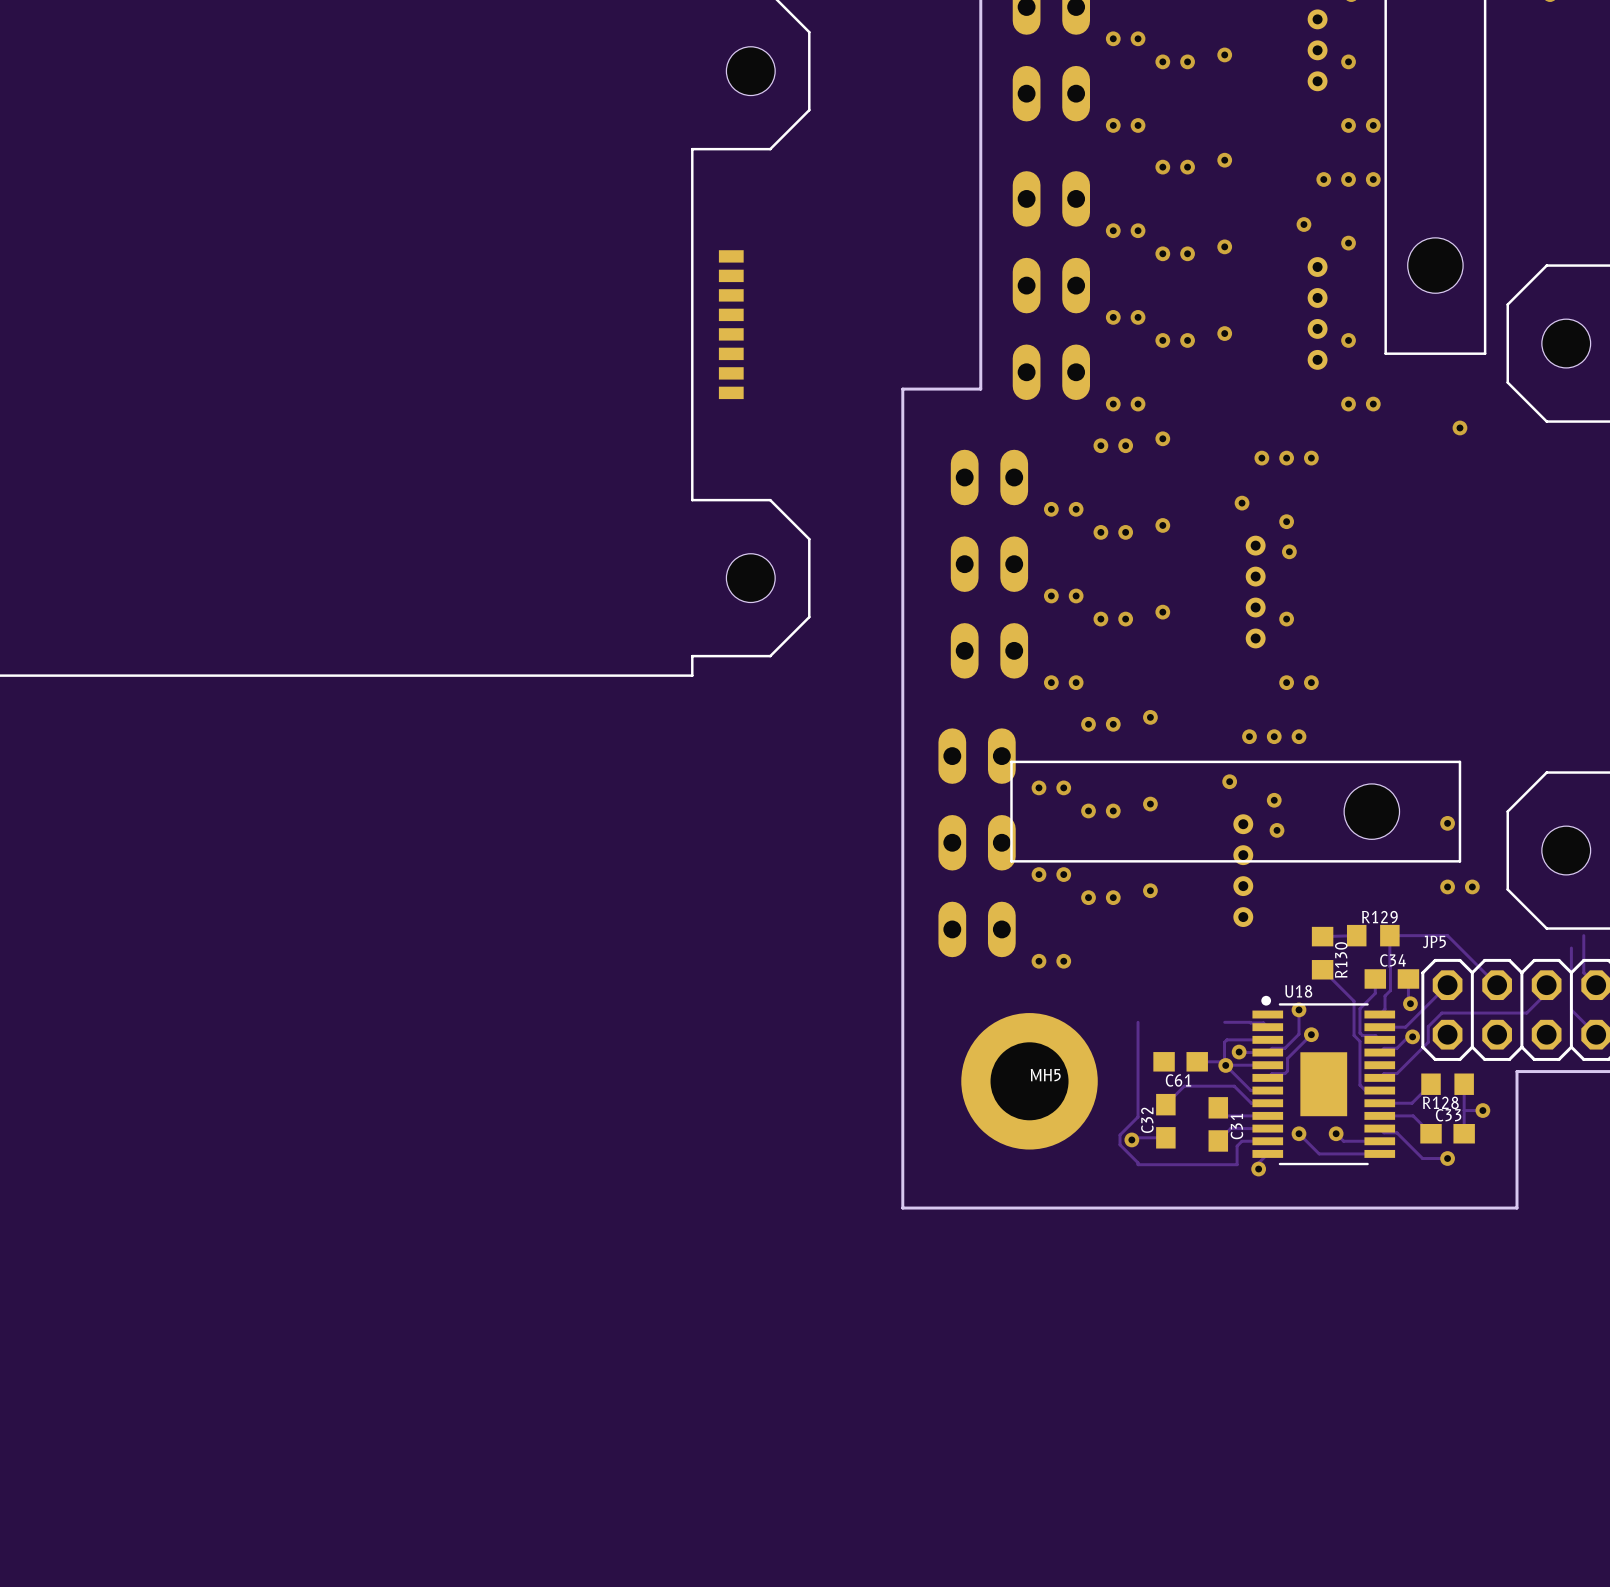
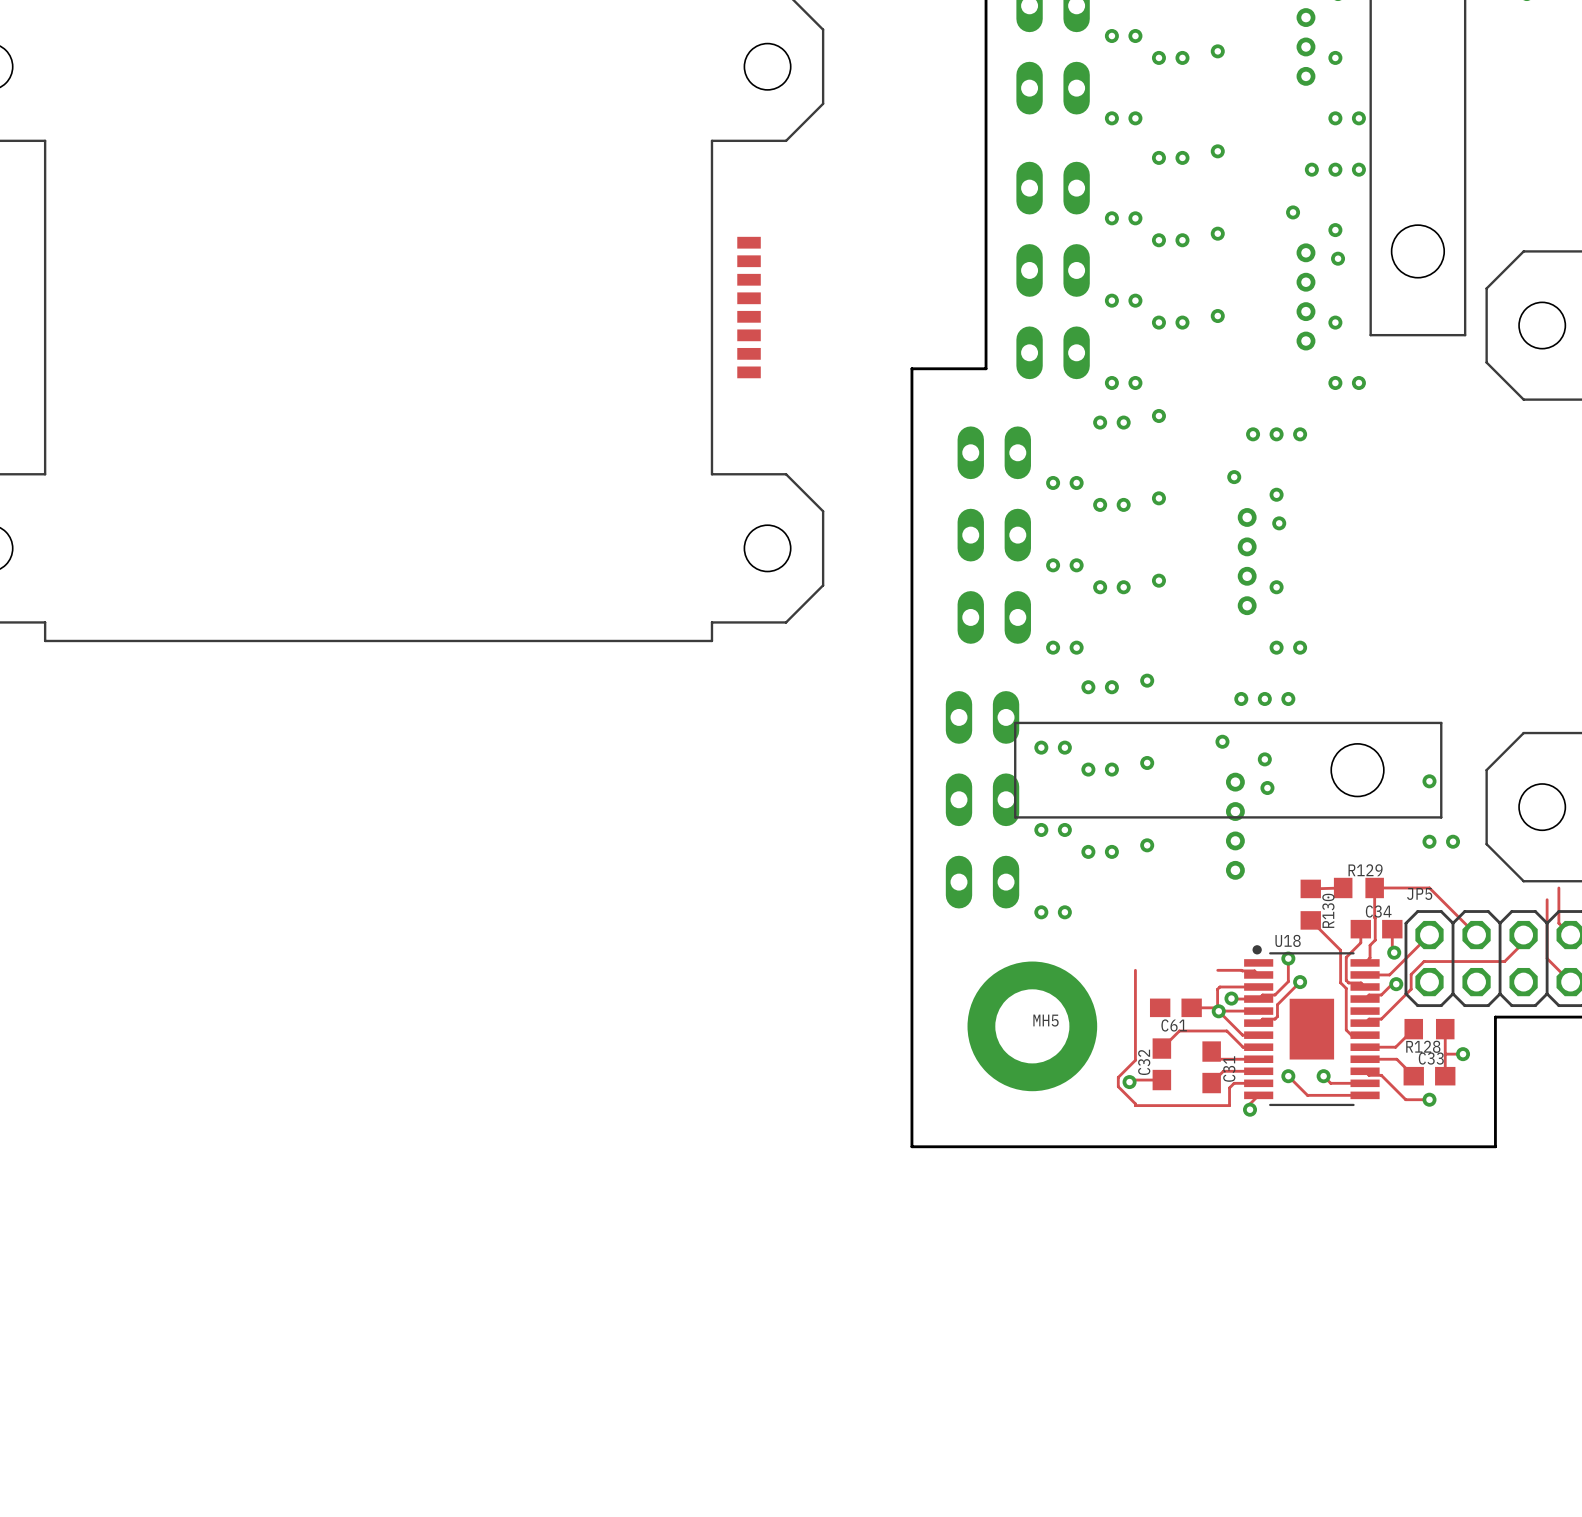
via: none -> (1338, 258)
via: (1459, 427) -> none

